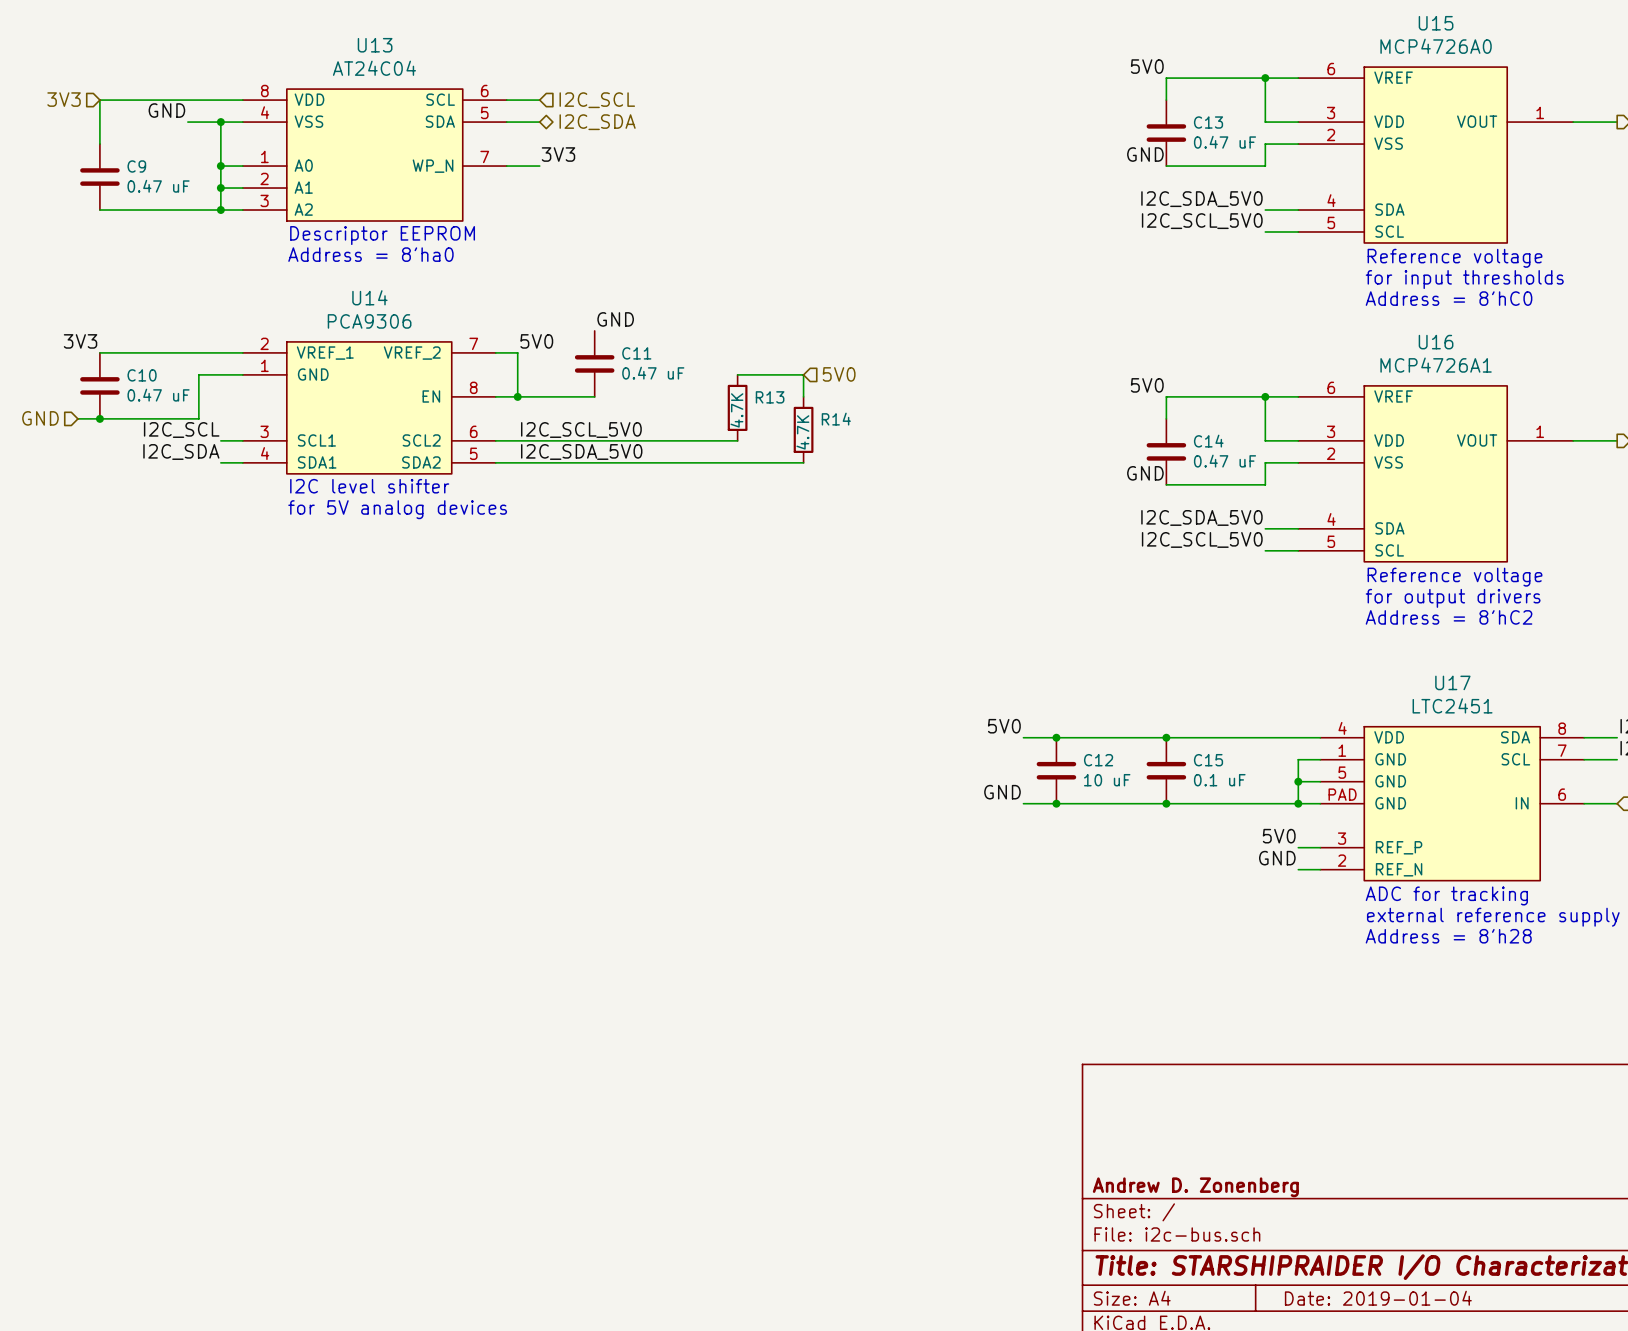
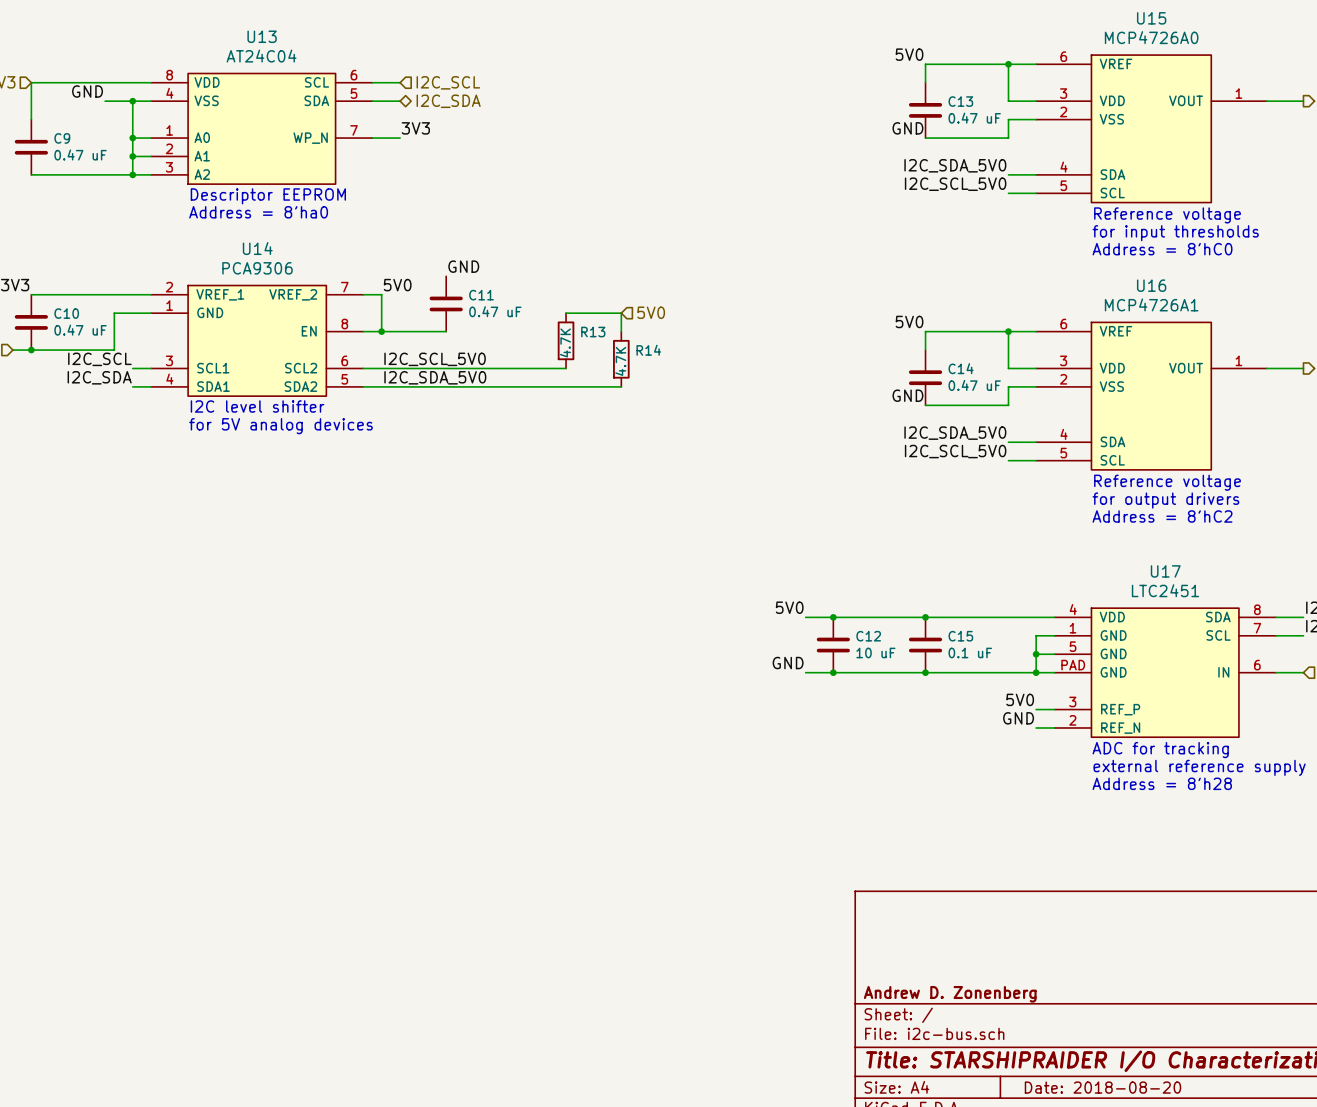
title block: Date: 2019-01-04 (1378, 1298) -> Date: 2018-08-20 (1102, 1087)

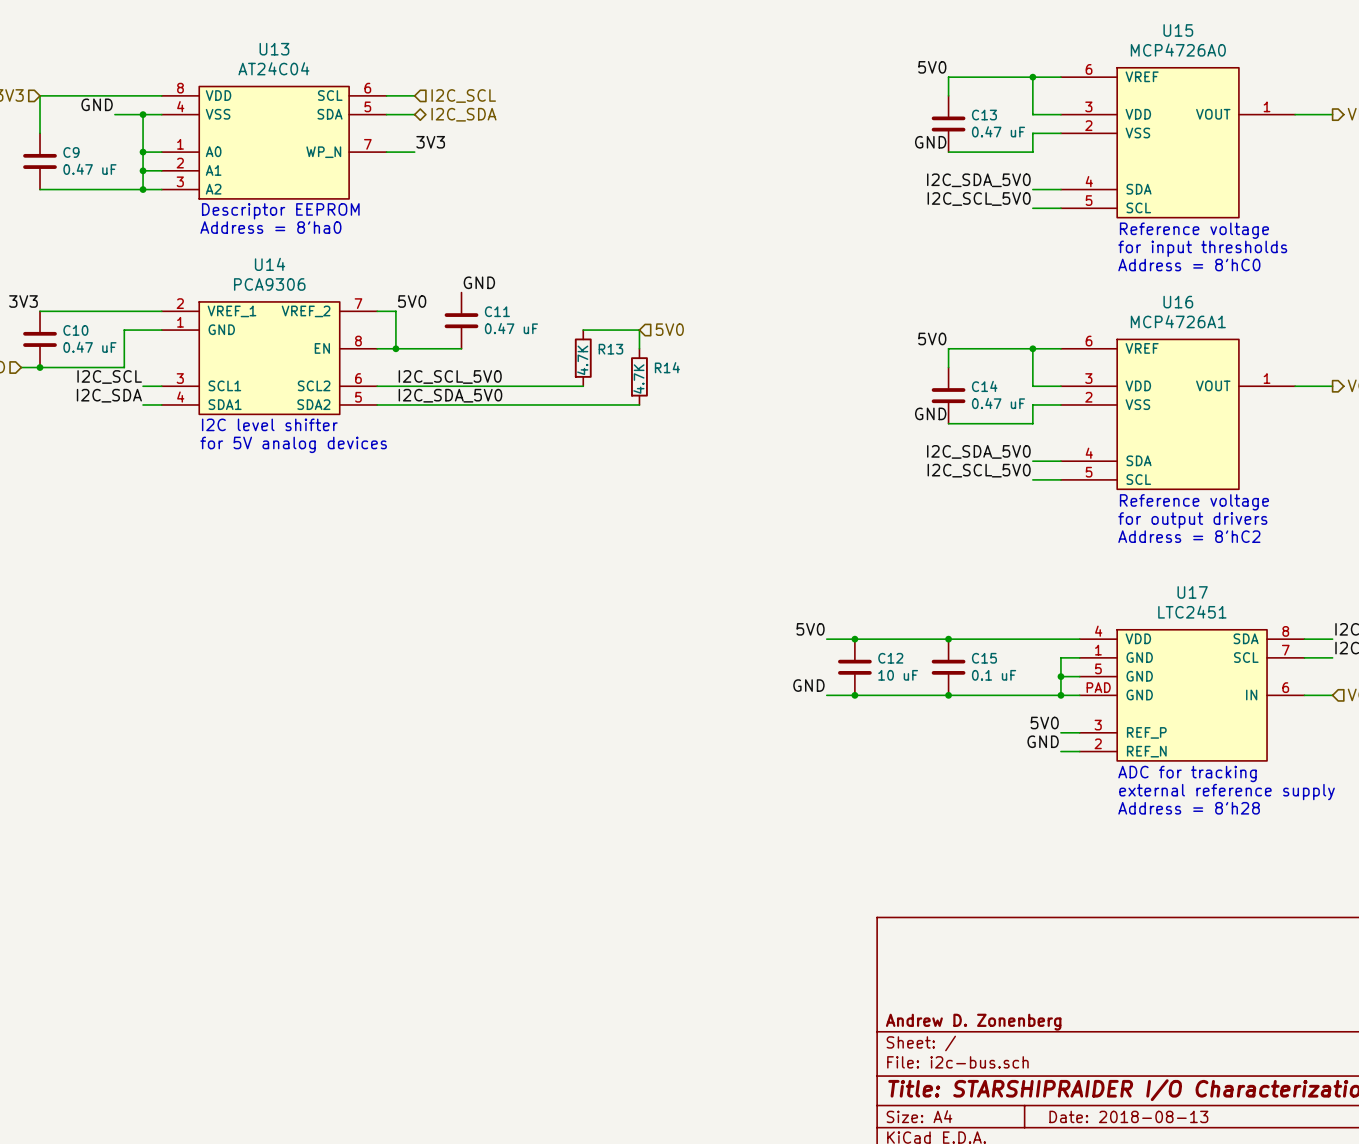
title block: Date: 2018-08-20 (1102, 1087) -> Date: 2018-08-13 (1128, 1116)

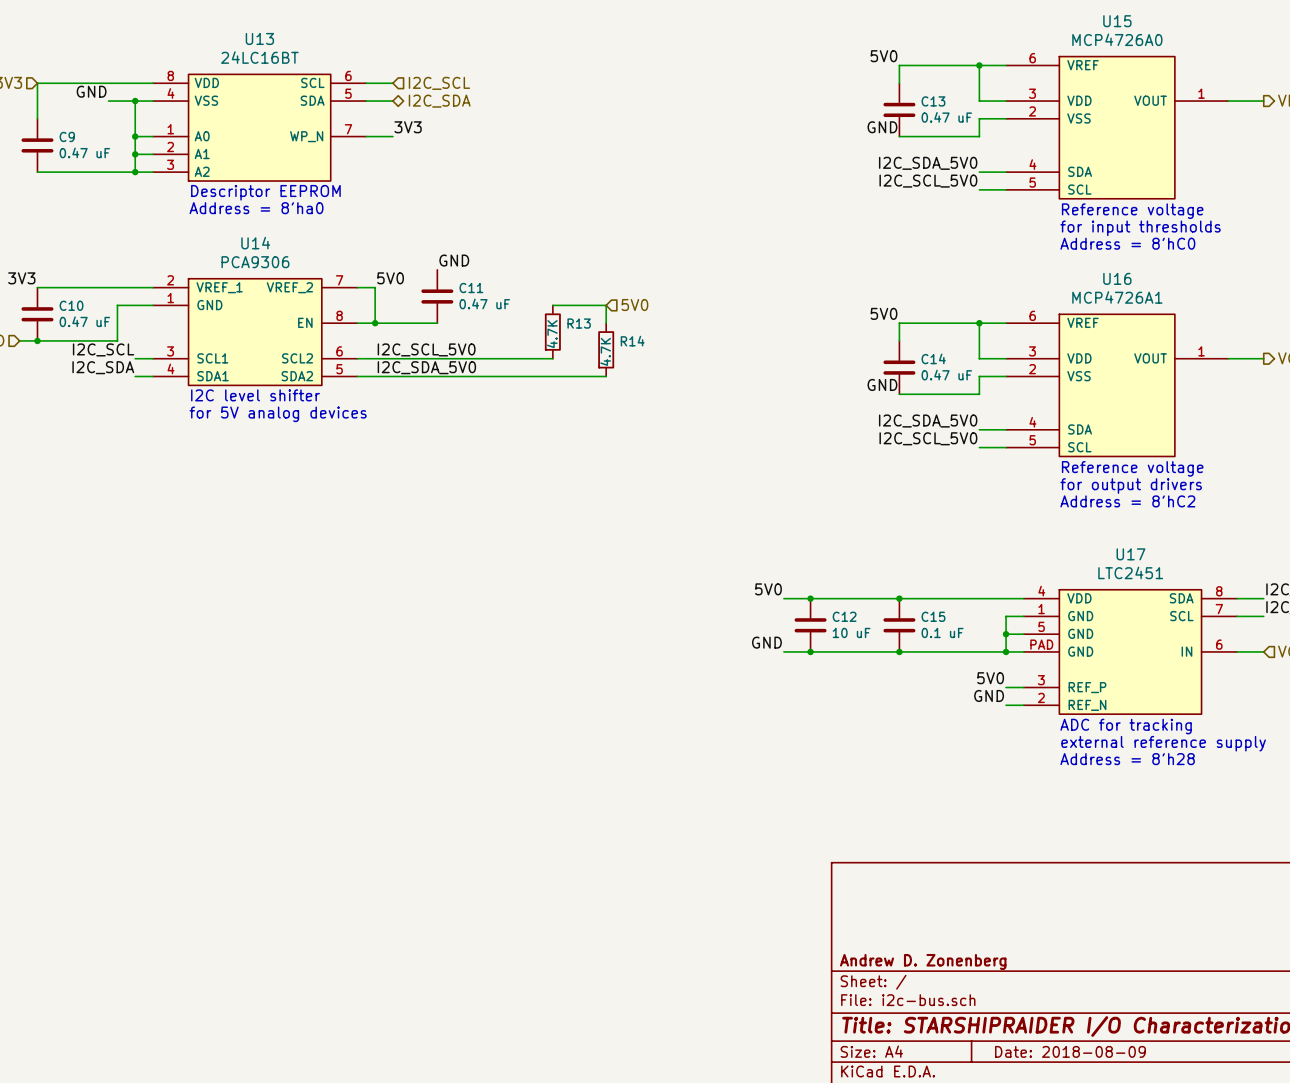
U13 value: AT24C04 (273, 68) -> 24LC16BT (259, 57)
title block: Date: 2018-08-13 (1128, 1116) -> Date: 2018-08-09 (1070, 1051)

